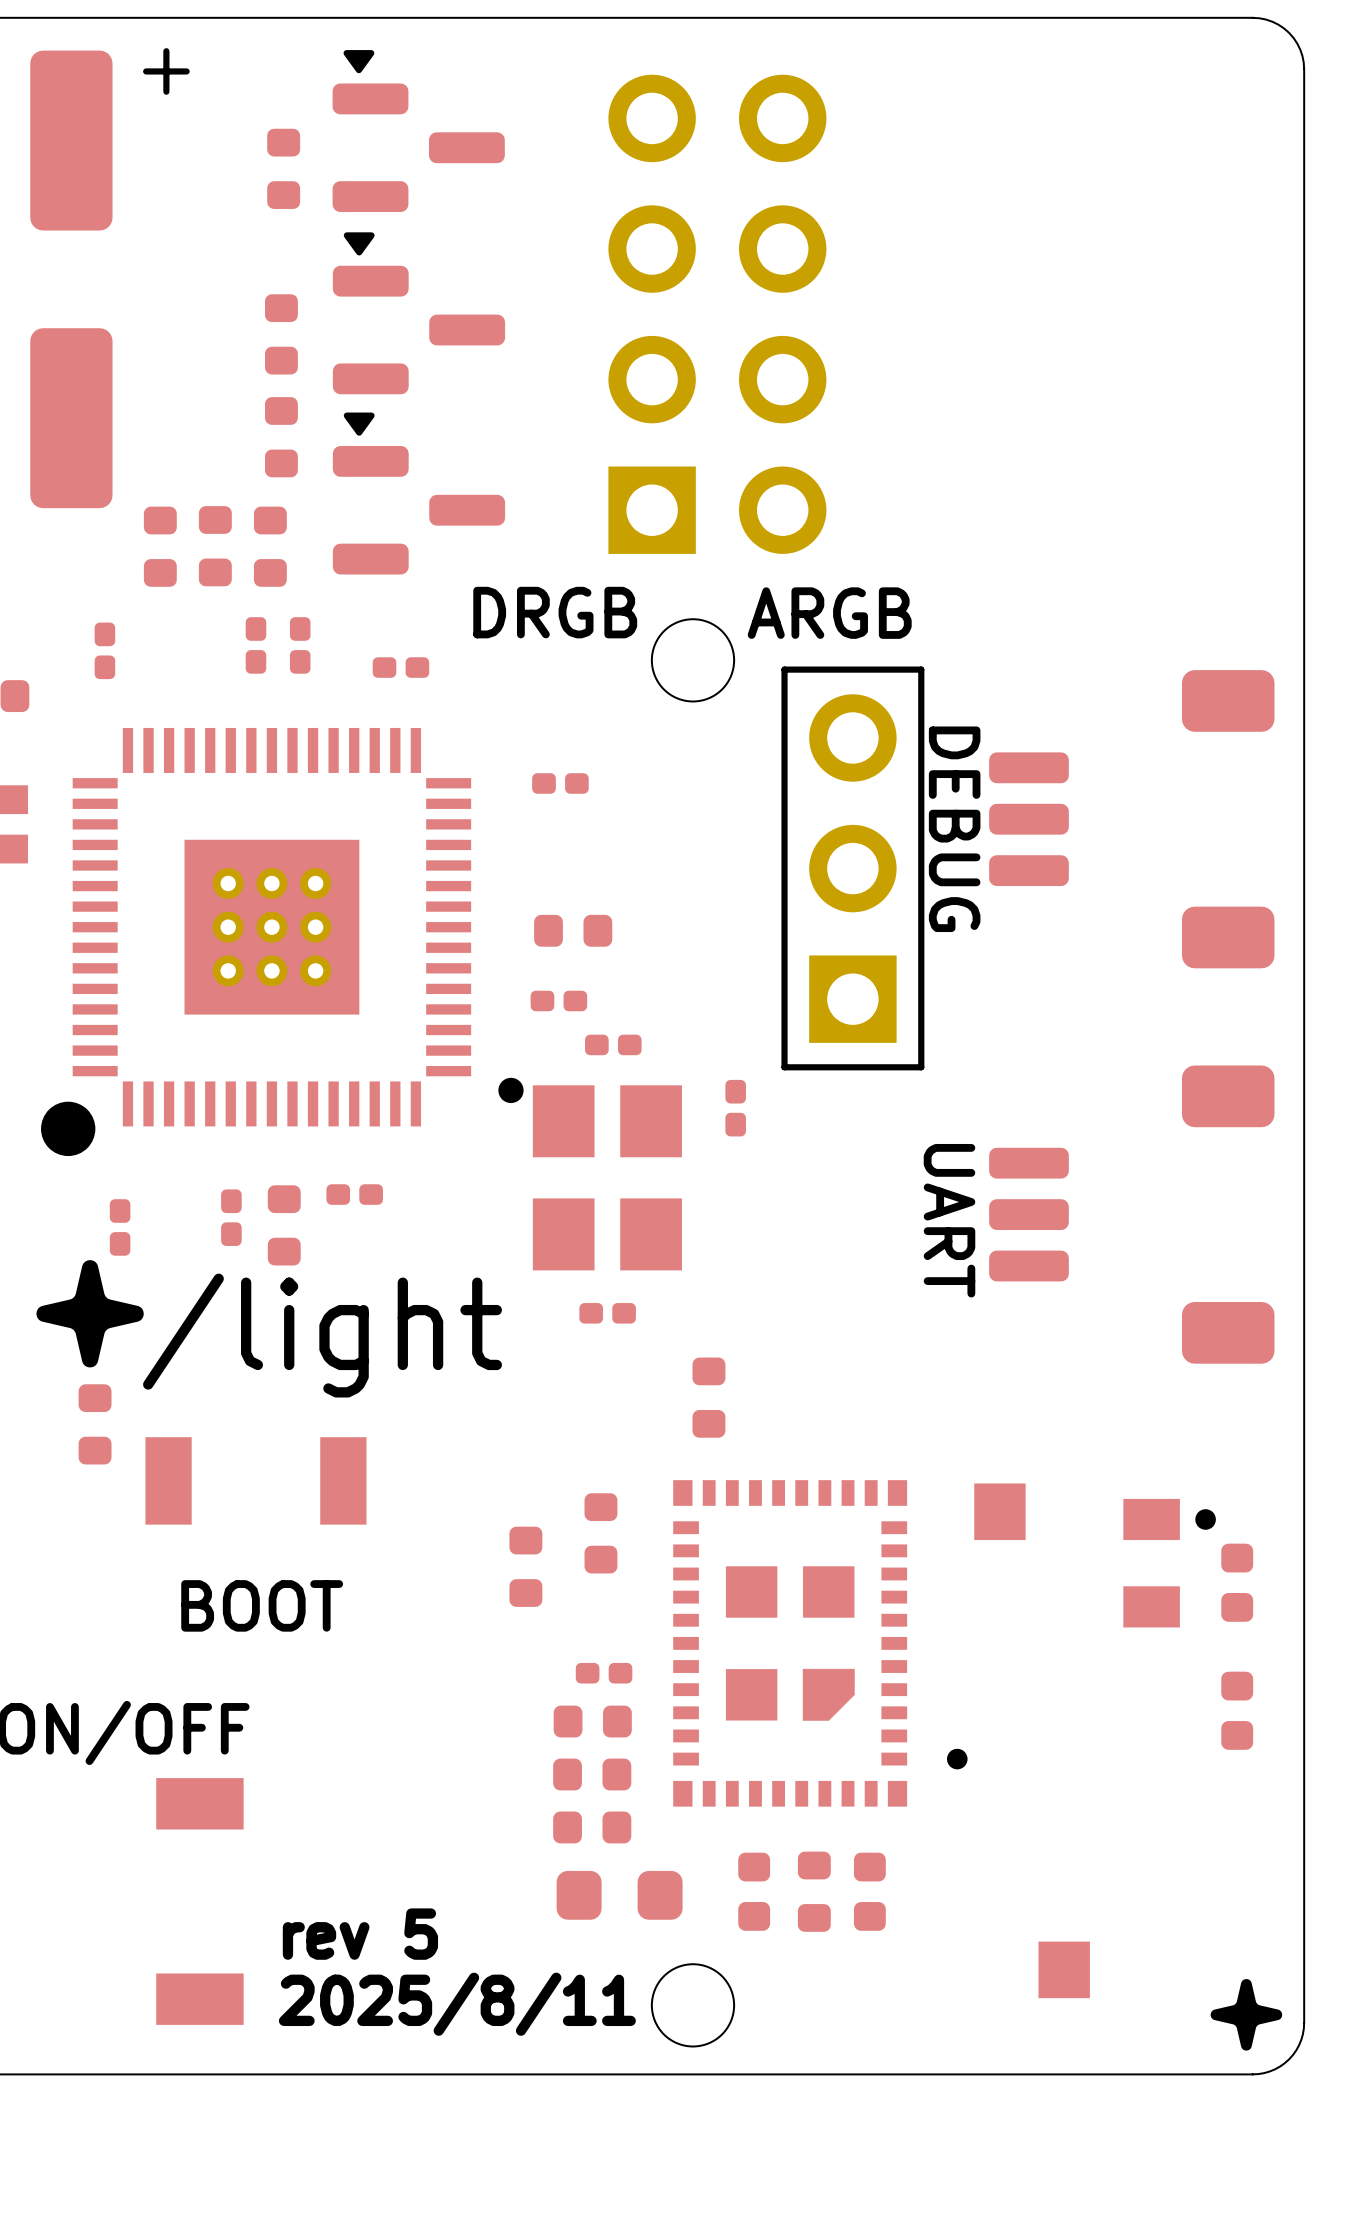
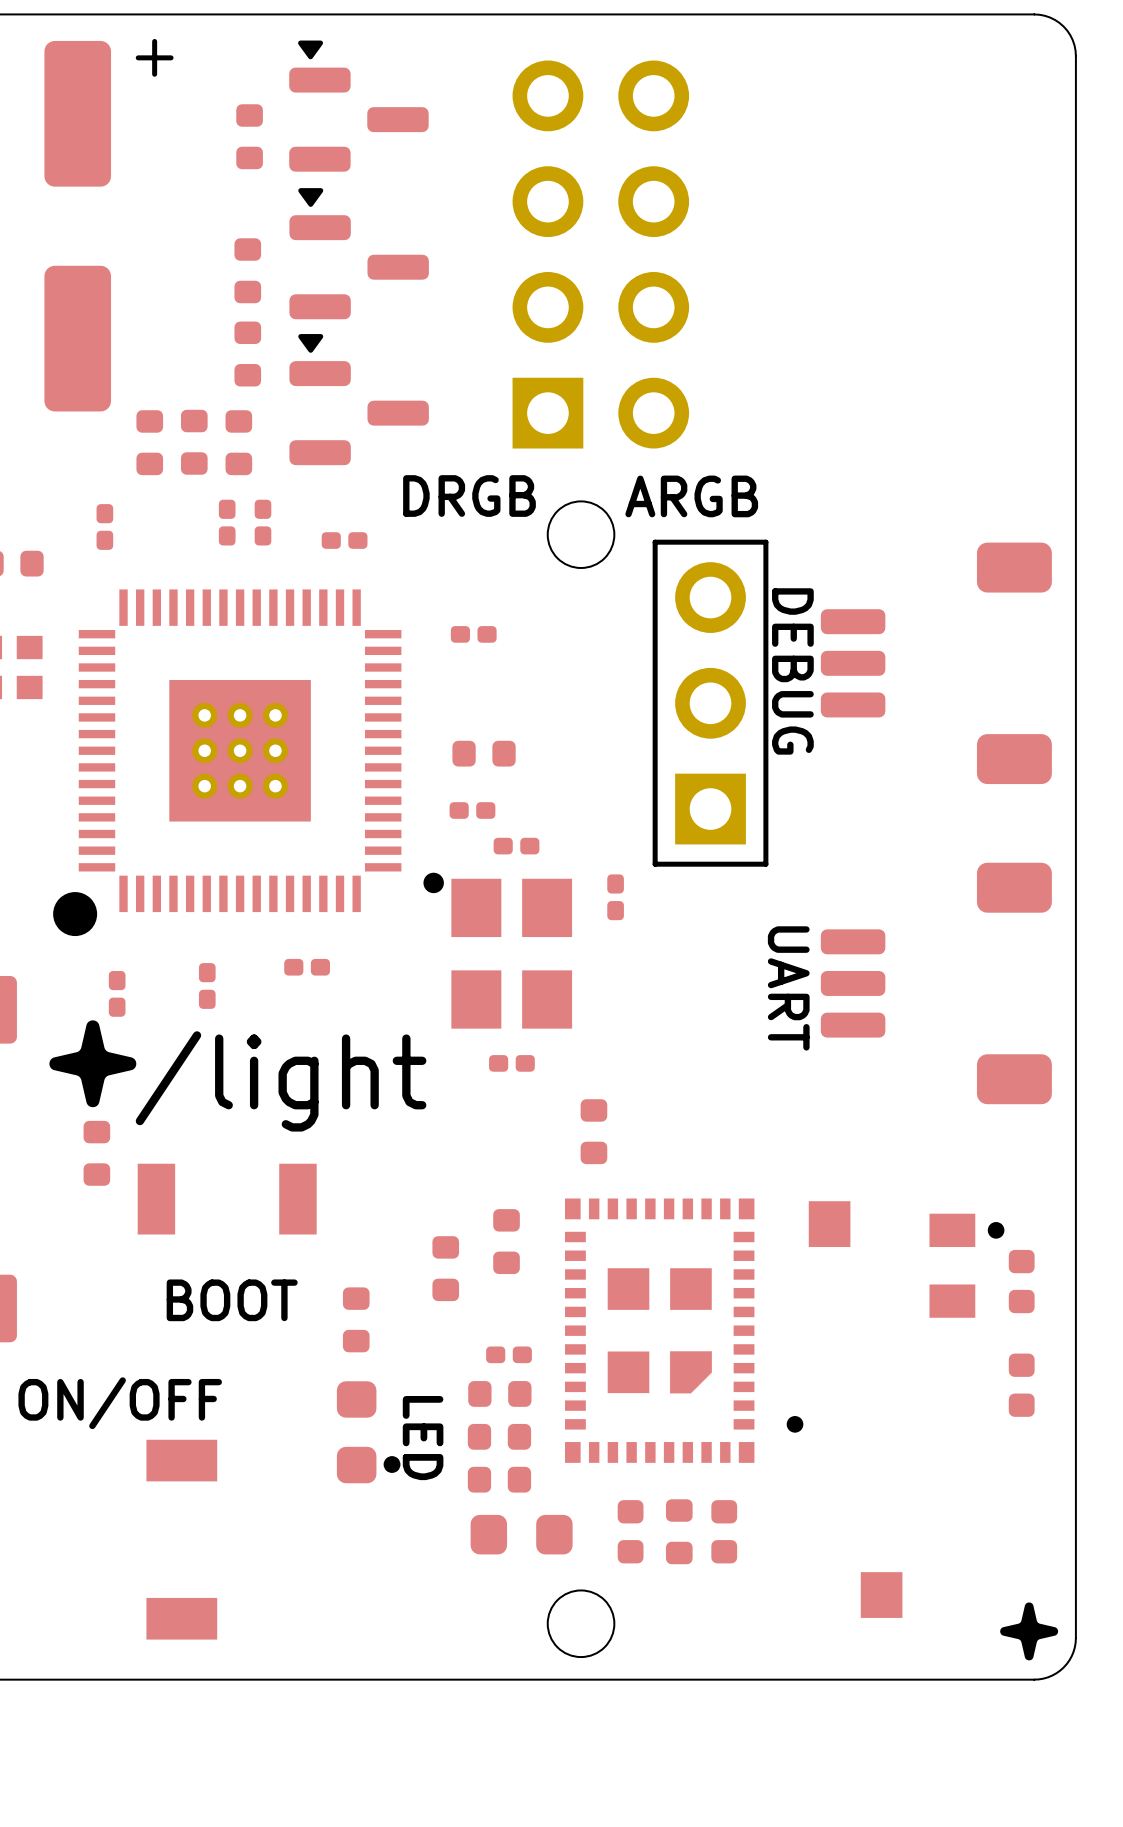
part position: (284, 1225) -> (356, 1319)
part: none -> (368, 1432)
text: none -> LED (423, 1438)
text: rev 5 (360, 1934) -> none
text: 2025/8/11 (457, 2004) -> none

